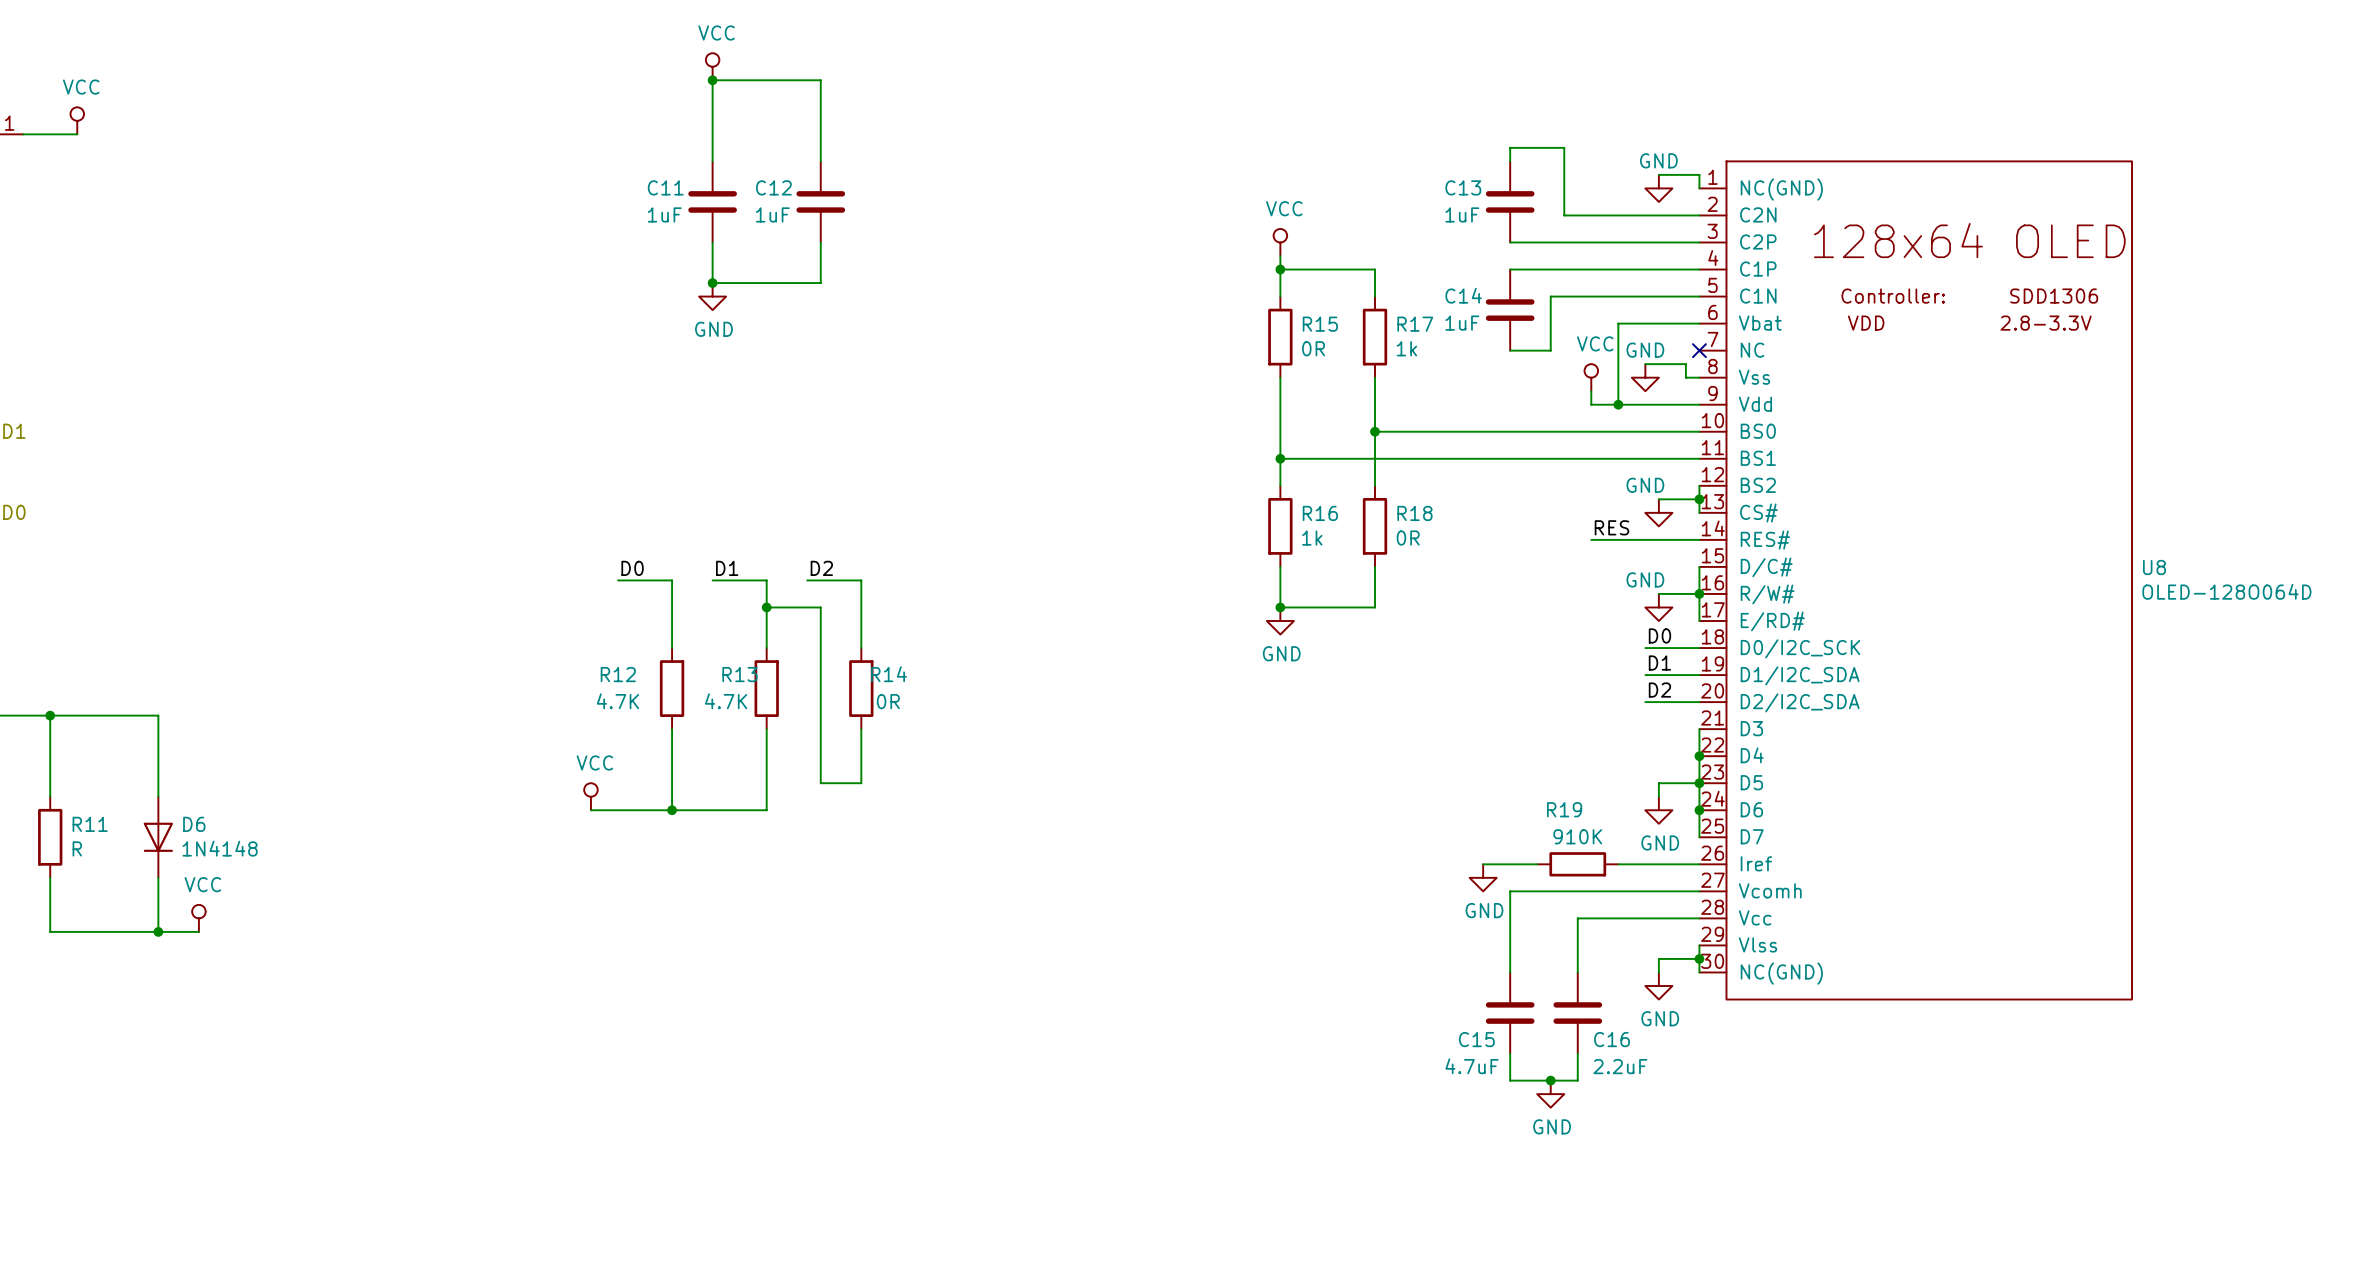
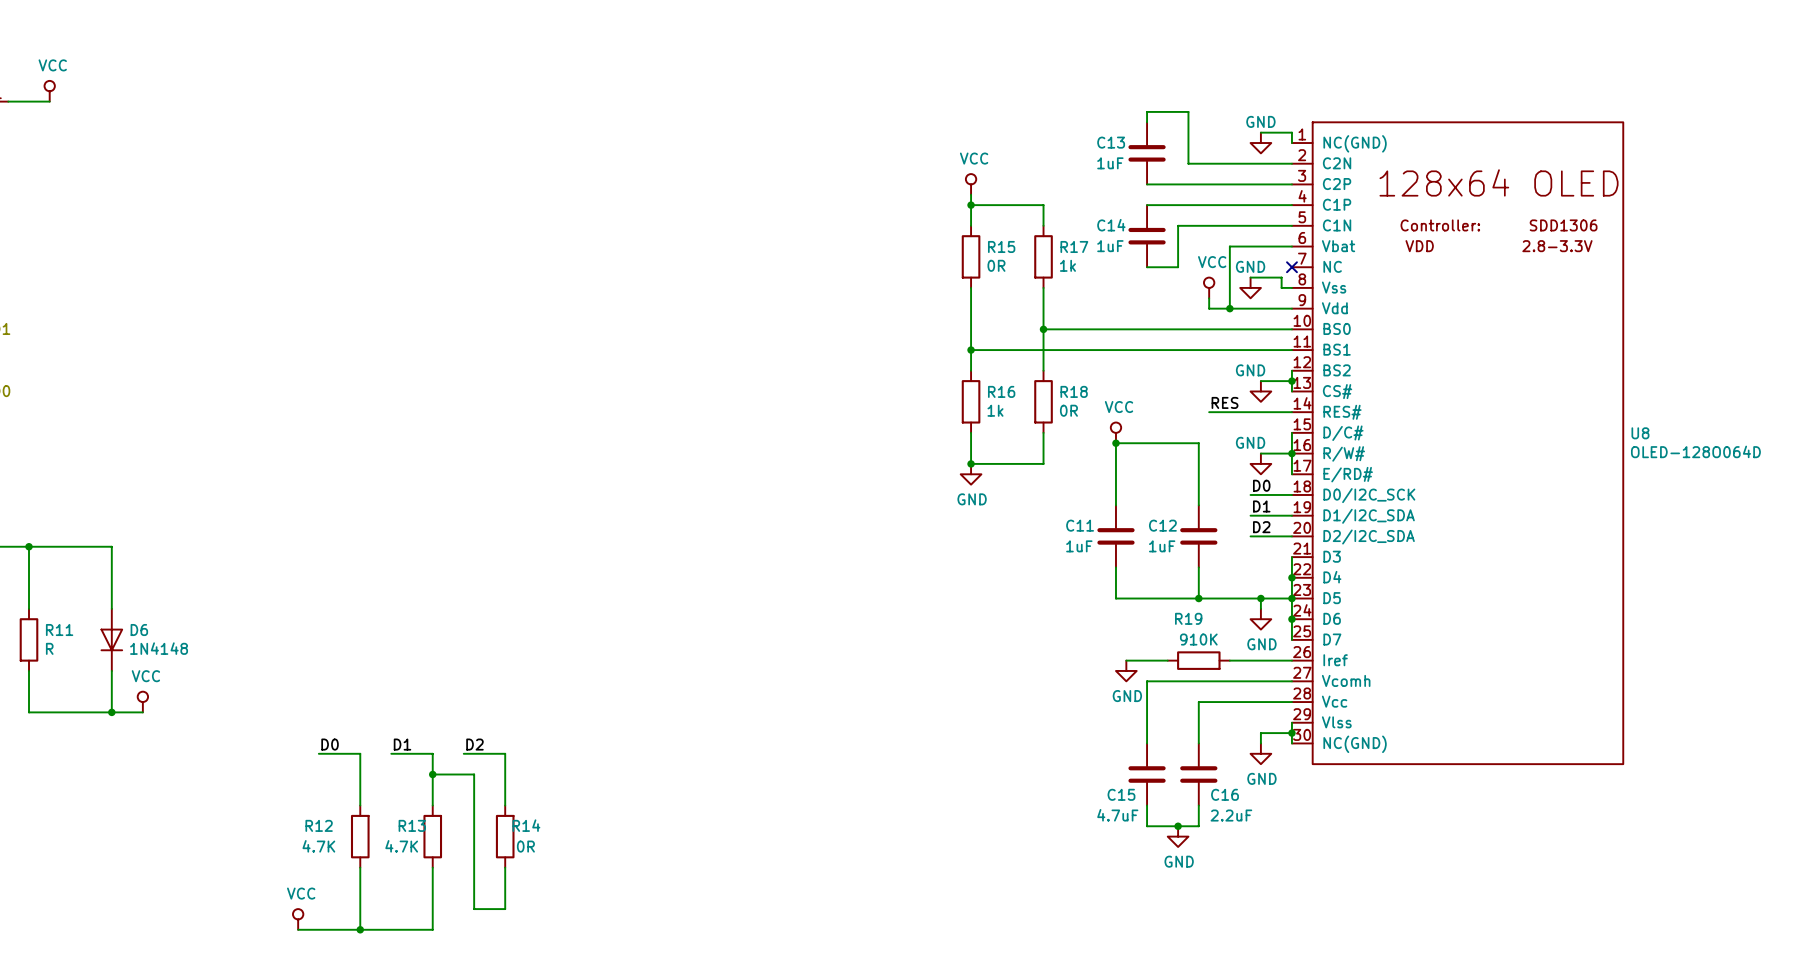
power symbol: VCC (712, 66) -> none
junction: (712, 80) -> none
wire: (712, 161) (712, 80) (820, 80) (820, 161) -> none
C11 position: (712, 201) -> (1115, 536)
C12 position: (820, 201) -> (1198, 536)
wire: (712, 242) (712, 283) (820, 283) (820, 242) -> none
junction: (712, 283) -> none
power symbol: GND (712, 296) -> none
power symbol: none -> VCC (1115, 432)
label: D0 (632, 568) -> none
label: D1 (727, 568) -> none
label: D2 (821, 568) -> none
wire: (617, 580) (672, 580) (672, 648) -> none
wire: (712, 580) (766, 580) (766, 648) -> none
wire: (807, 580) (861, 580) (861, 648) -> none
junction: none -> (1115, 443)
wire: (766, 607) (820, 607) (820, 783) (861, 783) (861, 729) -> none
junction: (766, 607) -> none
wire: none -> (1115, 505) (1115, 443) (1198, 443) (1198, 505)
R12 position: (672, 688) -> (360, 836)
R13 position: (766, 688) -> (432, 836)
R14 position: (861, 688) -> (505, 836)
wire: (672, 729) (672, 810) -> none
wire: (766, 729) (766, 810) (590, 810) -> none
wire: none -> (1115, 567) (1115, 598) (1260, 598)
wire: none -> (1198, 567) (1198, 598)
junction: none -> (1198, 598)
junction: none -> (1260, 598)
power symbol: VCC (590, 796) -> none
junction: (672, 810) -> none
label: none -> D0 (330, 744)
label: none -> D1 (402, 744)
label: none -> D2 (474, 744)
wire: none -> (318, 753) (360, 753) (360, 805)
wire: none -> (391, 753) (432, 753) (432, 805)
wire: none -> (463, 753) (505, 753) (505, 805)
wire: none -> (432, 774) (474, 774) (474, 909) (505, 909) (505, 867)
junction: none -> (432, 774)
wire: none -> (360, 867) (360, 929)
wire: none -> (432, 867) (432, 929) (298, 929)
power symbol: none -> VCC (298, 919)
junction: none -> (360, 929)

